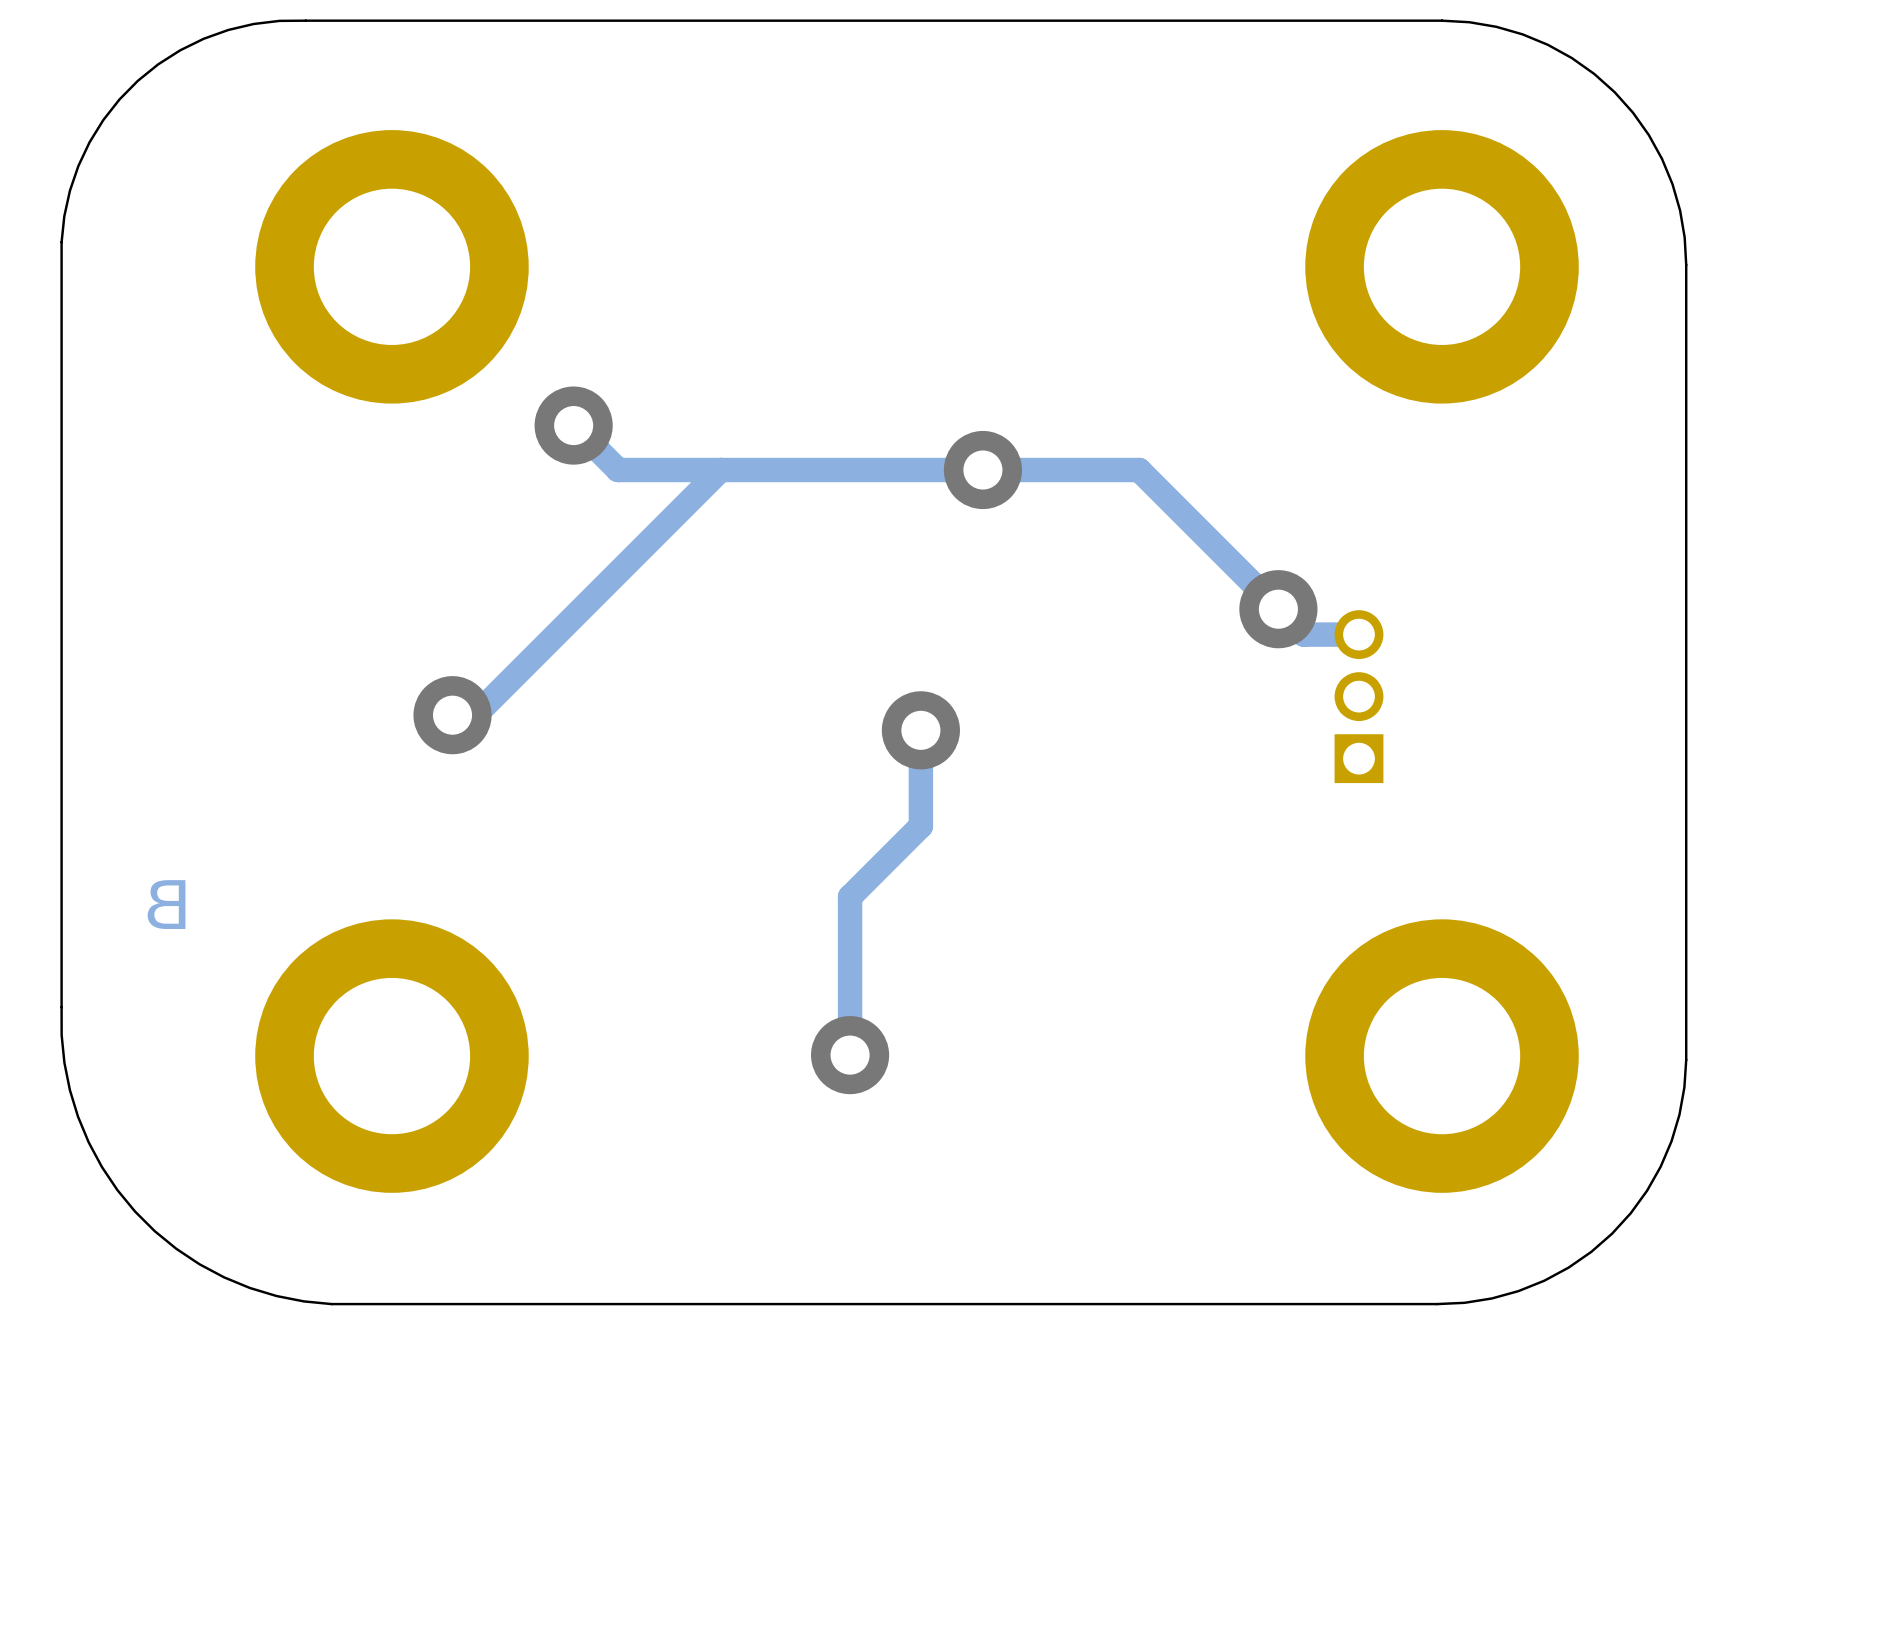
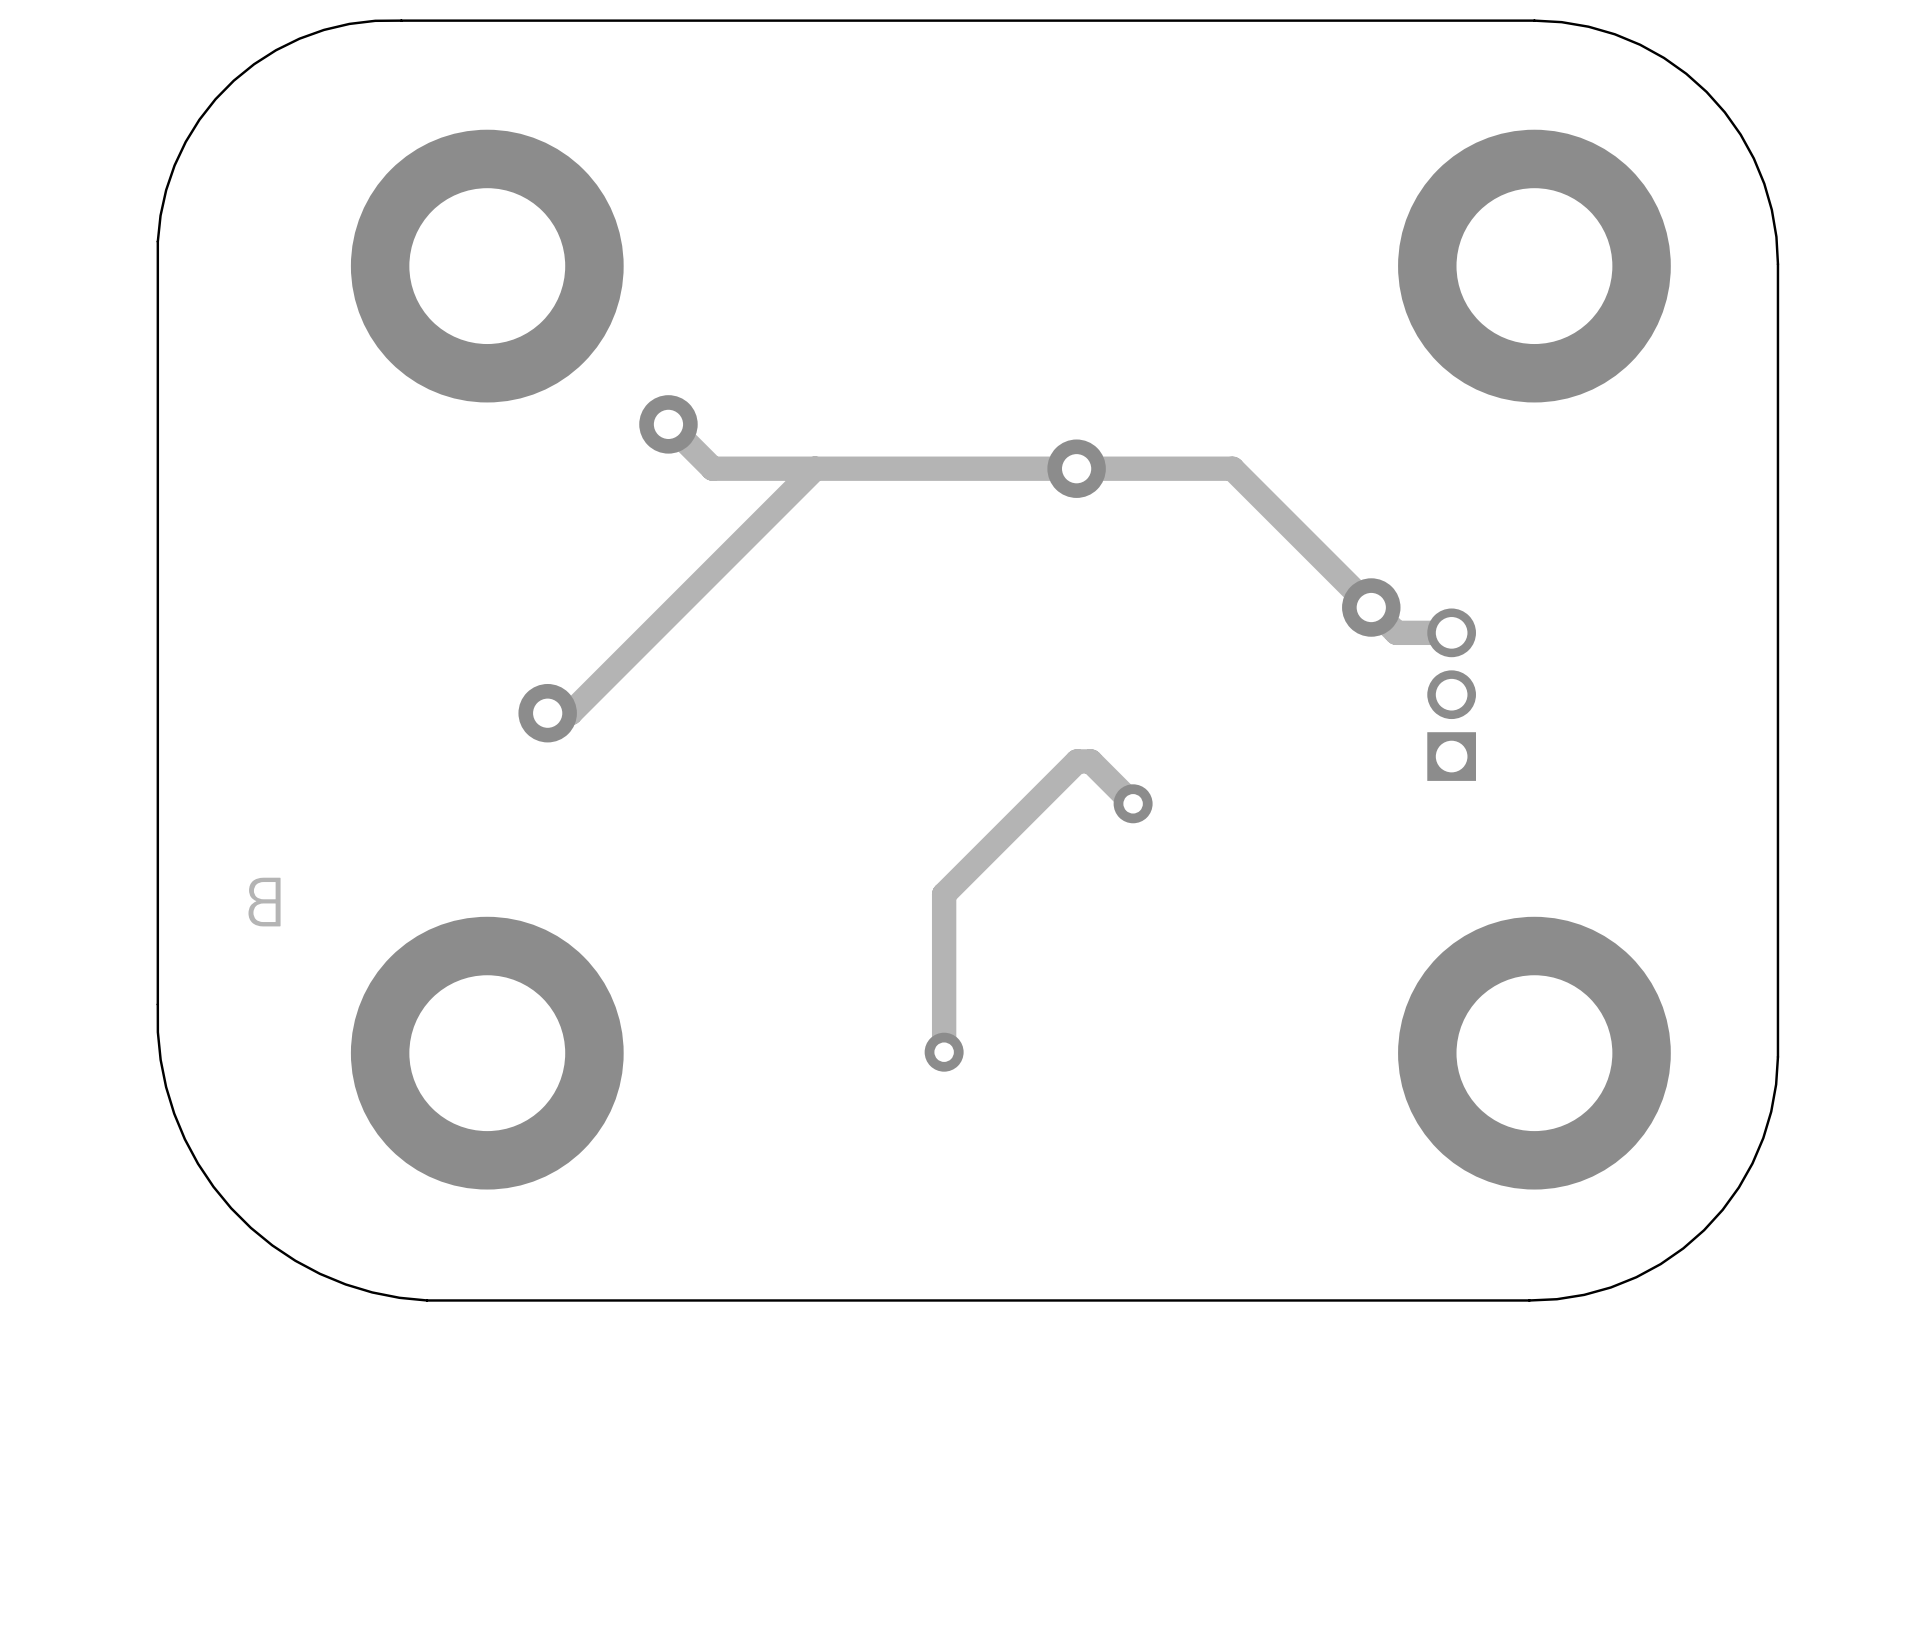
via size: [534, 386, 613, 465] -> [639, 395, 698, 454]
via size: [943, 430, 1022, 510] -> [1047, 439, 1106, 498]
via size: [1239, 570, 1318, 649] -> [1342, 578, 1401, 637]
via size: [413, 676, 492, 755] -> [518, 683, 577, 743]
track: (920, 730) (920, 826) -> (1133, 803) (1090, 761) (1077, 761) (1014, 823)
via: (920, 730) -> none
via: none -> (1133, 803)
via size: [811, 1016, 890, 1095] -> [924, 1032, 964, 1072]

